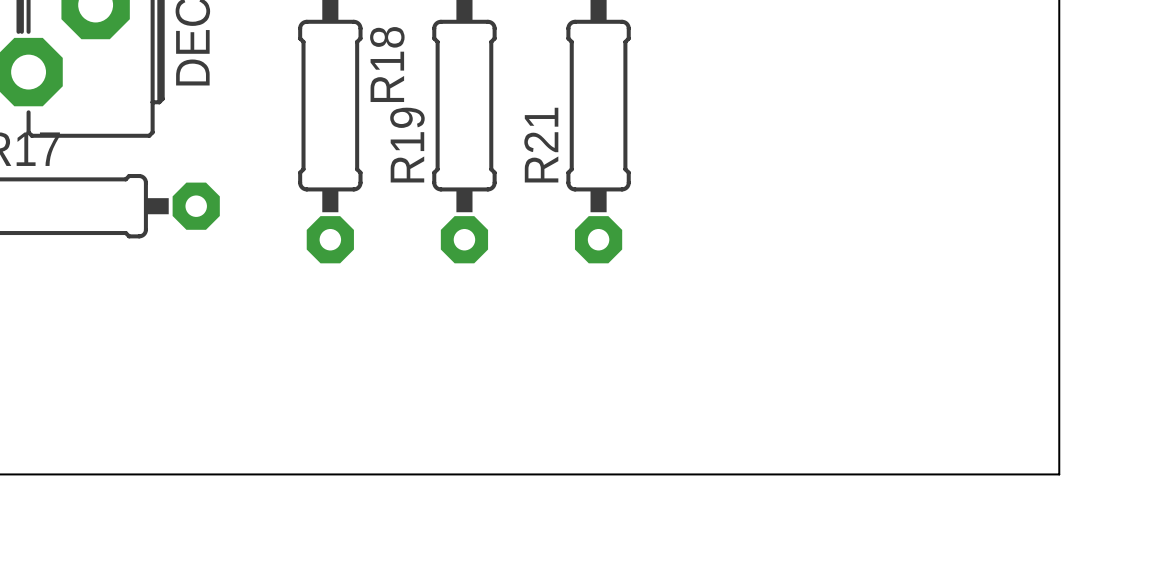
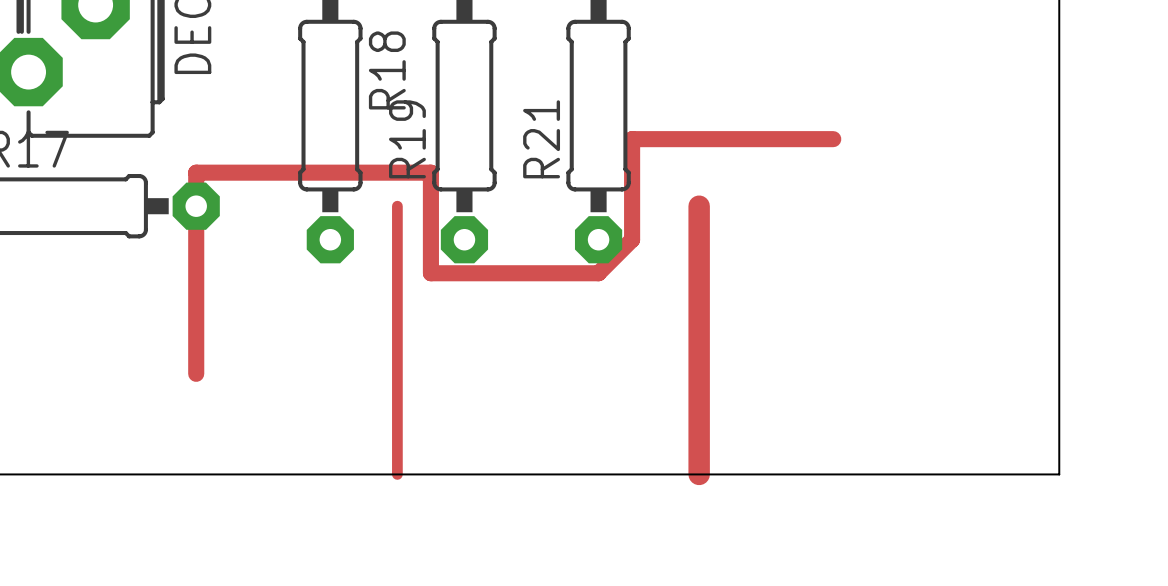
track: none -> (833, 139) (632, 139) (632, 239) (598, 273) (430, 273) (430, 172) (196, 172) (196, 373)
track: none -> (397, 206) (397, 474)
track: none -> (699, 206) (699, 474)

